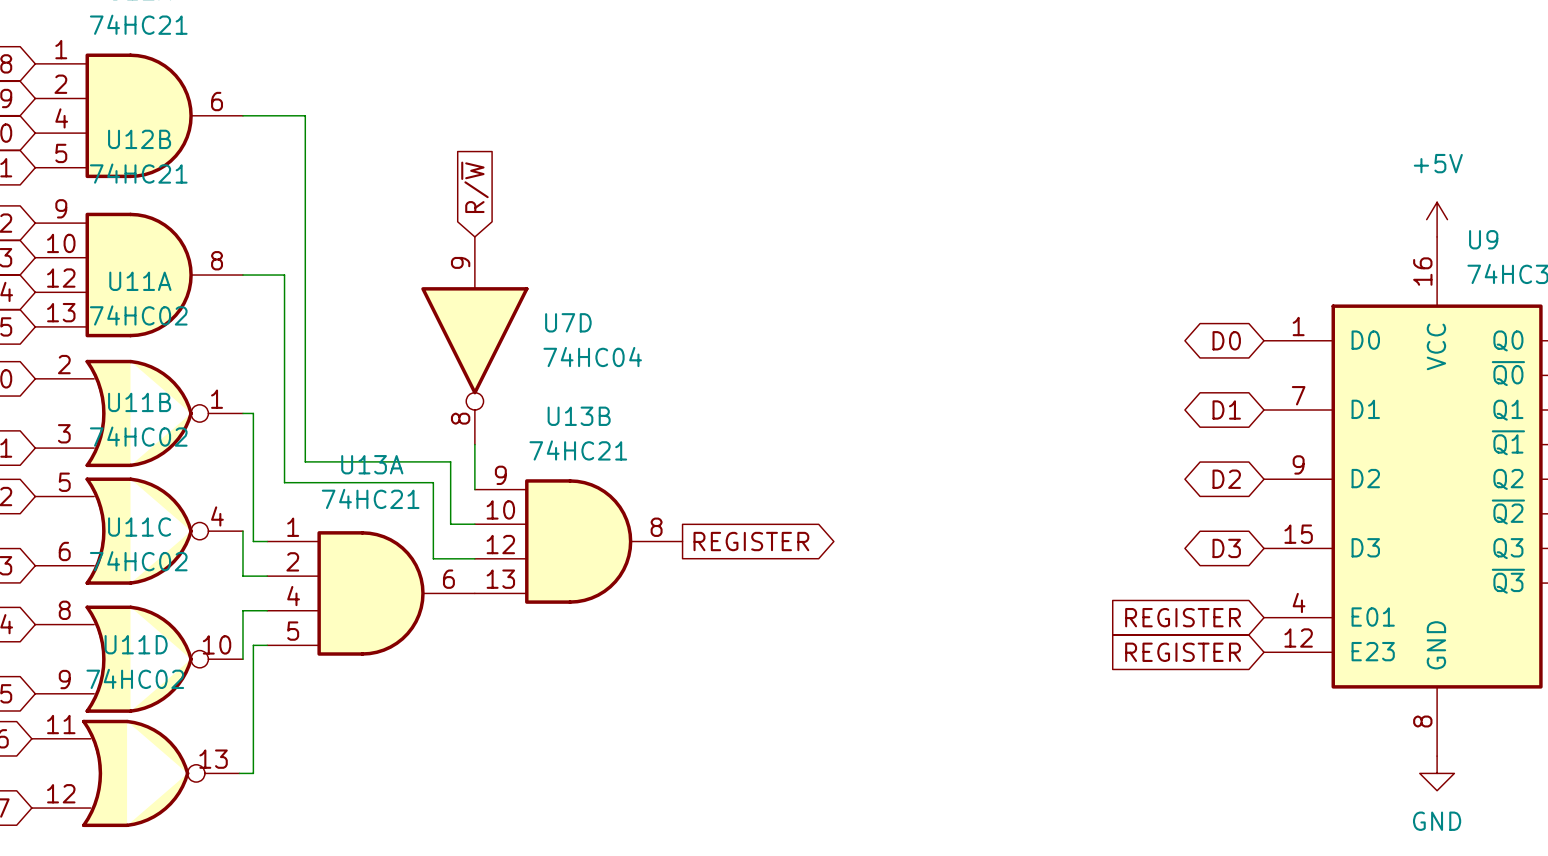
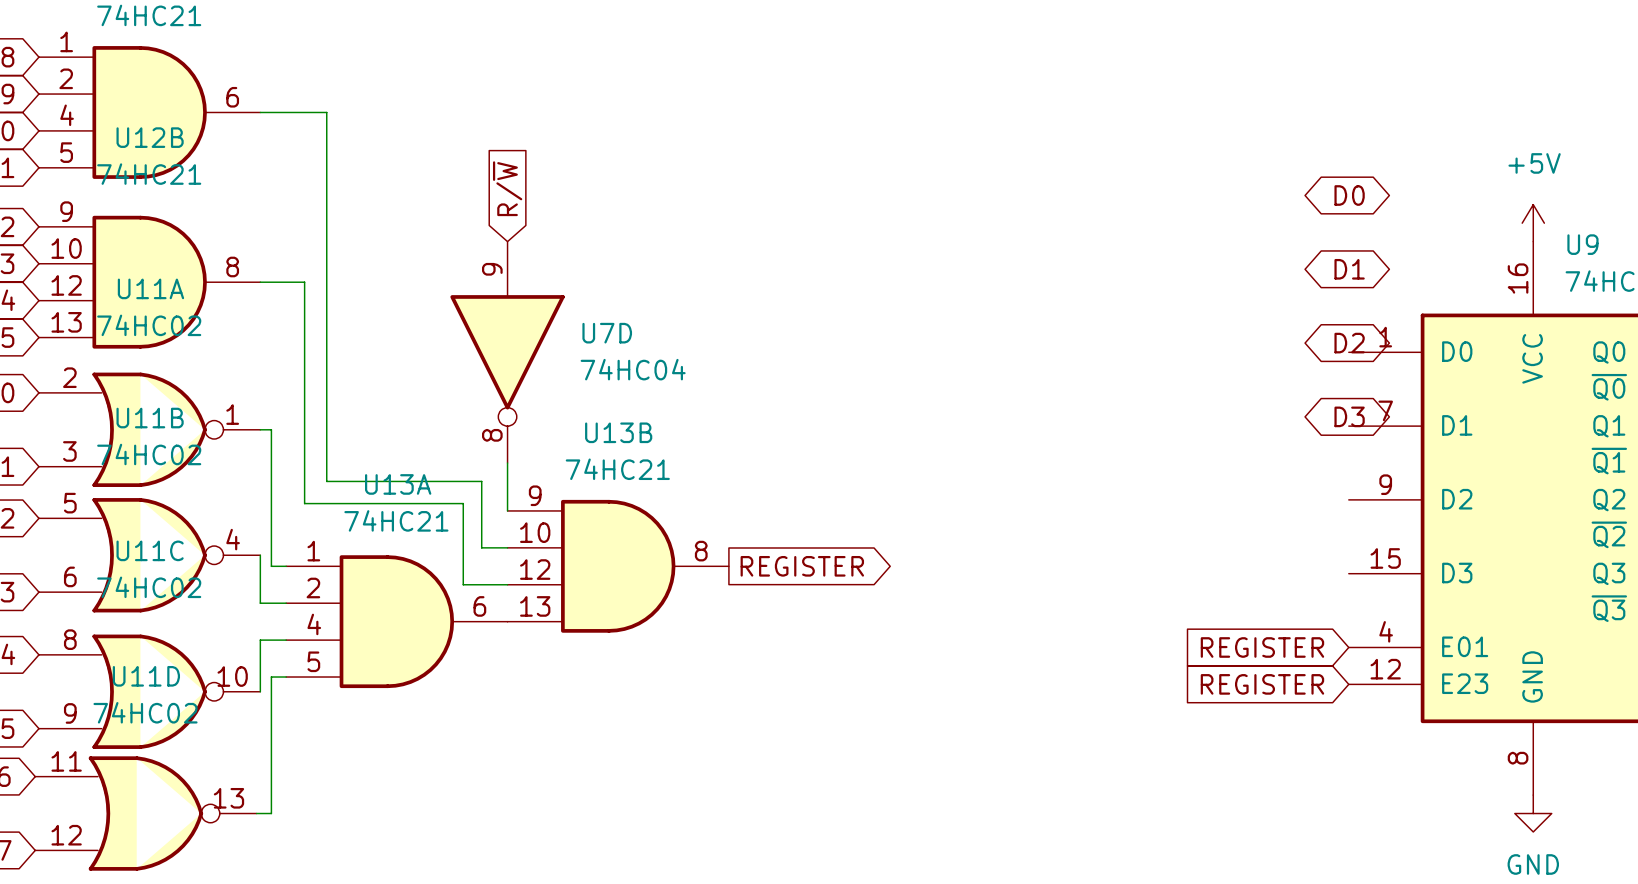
global label position: D0 (1226, 340) -> D0 (1349, 195)
global label position: D1 (1226, 410) -> D1 (1349, 269)
global label position: D2 (1226, 479) -> D2 (1349, 343)
global label position: D3 (1226, 548) -> D3 (1349, 416)

